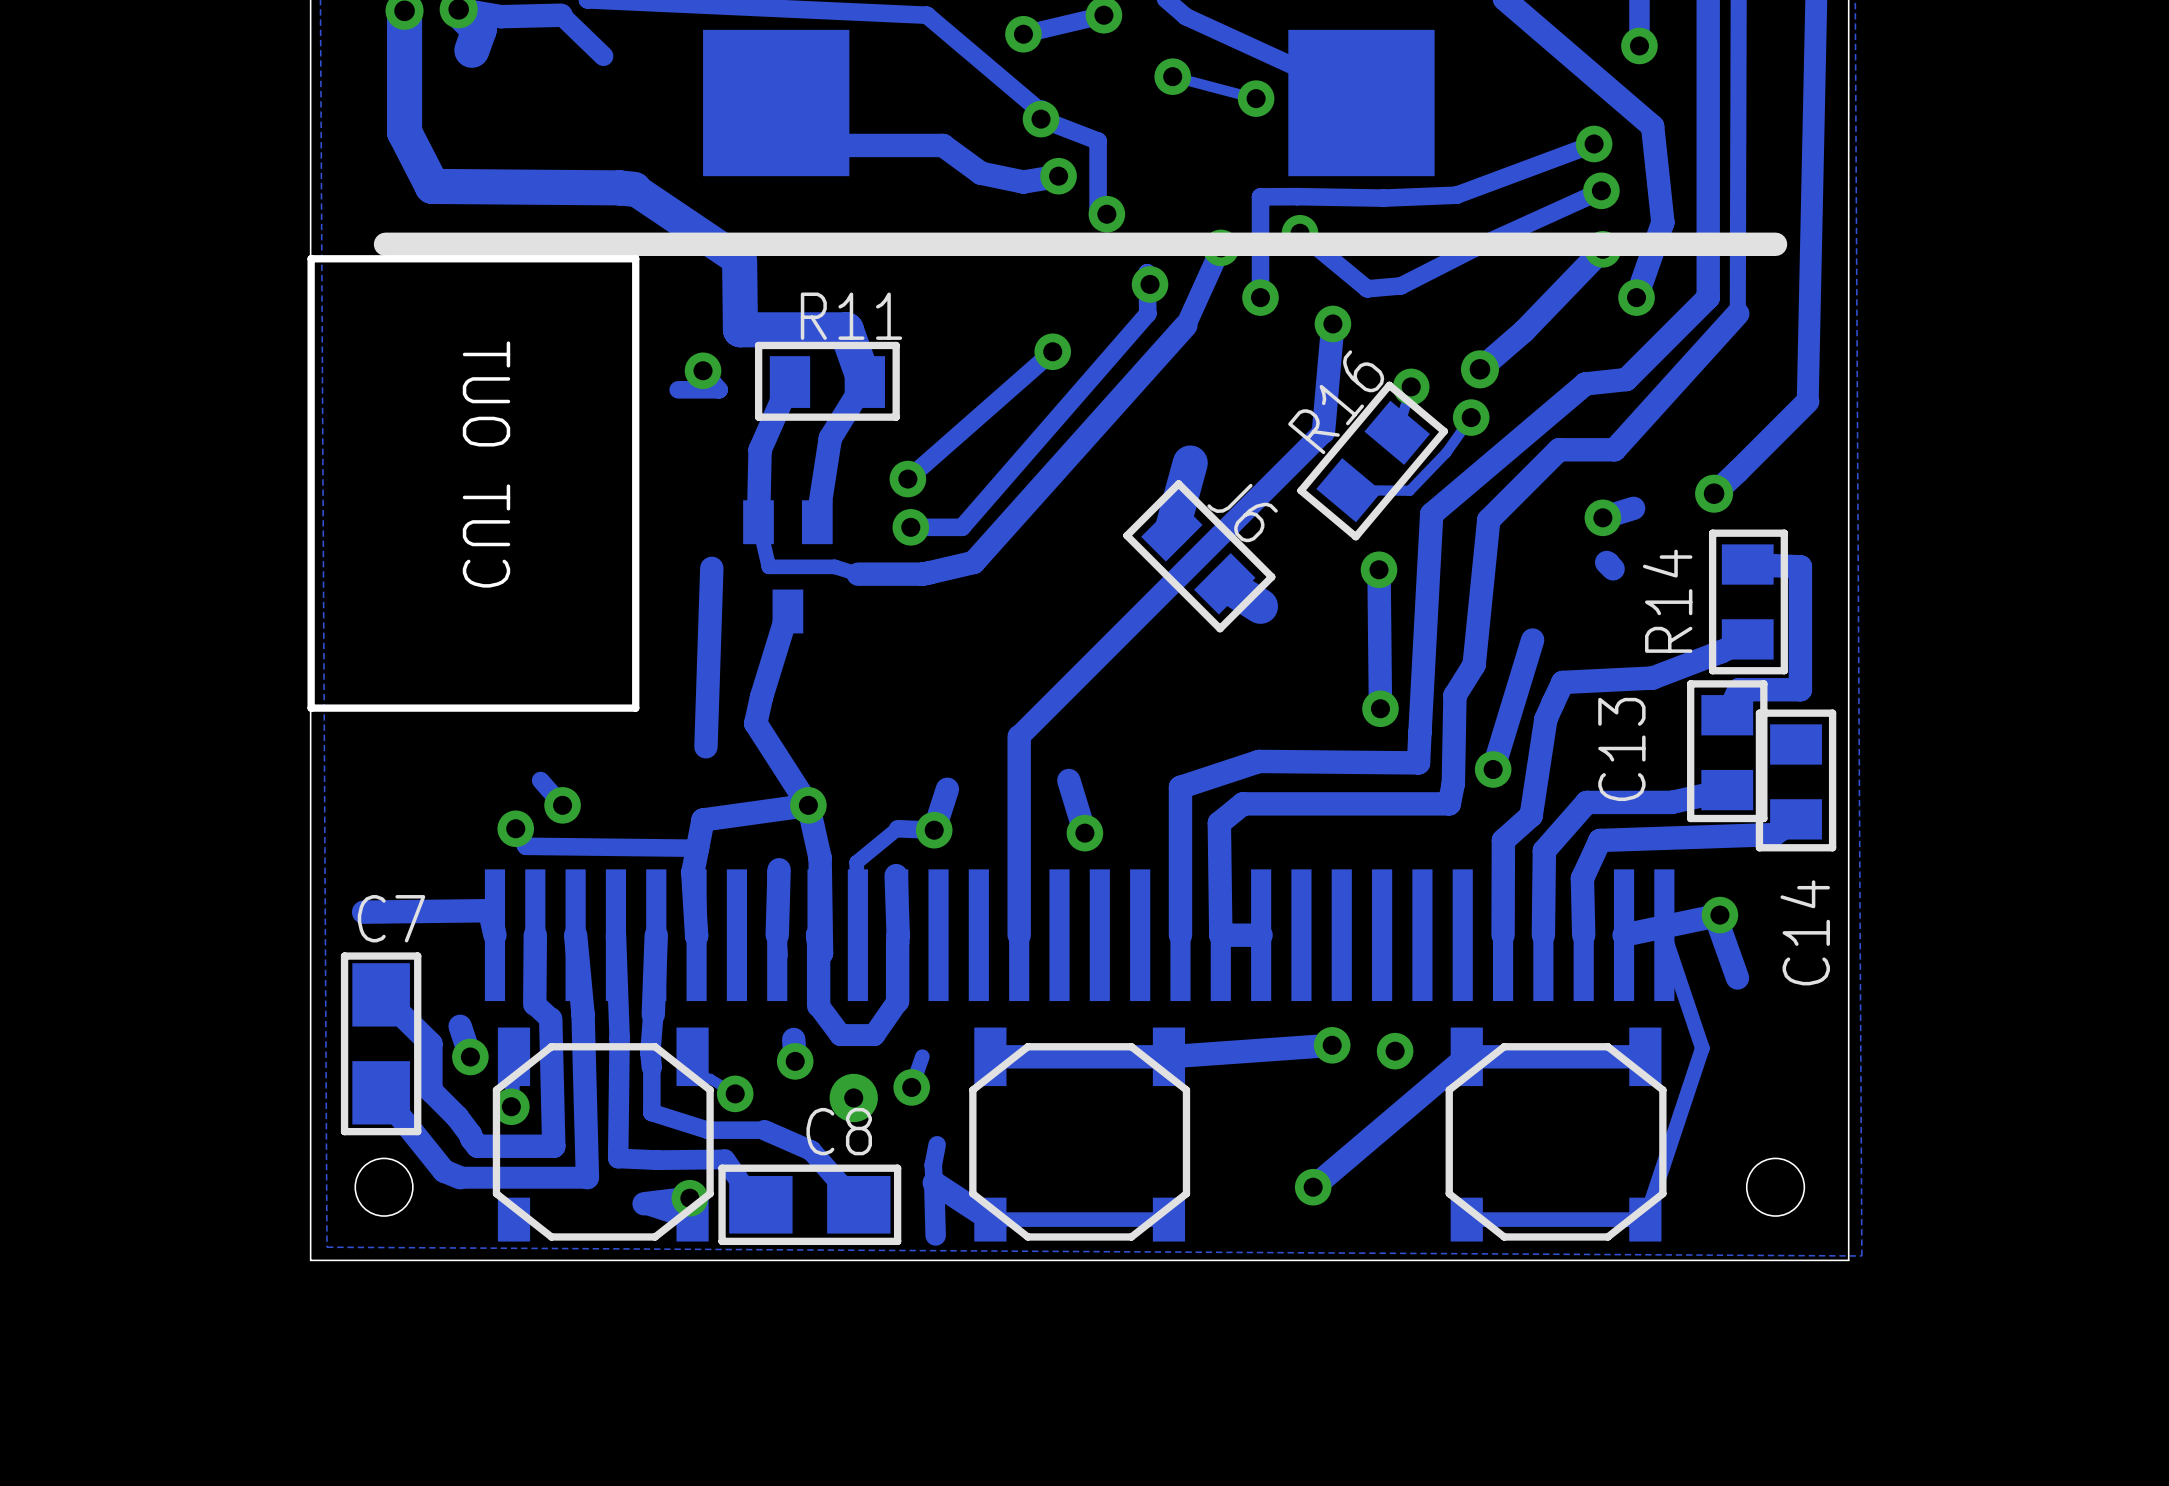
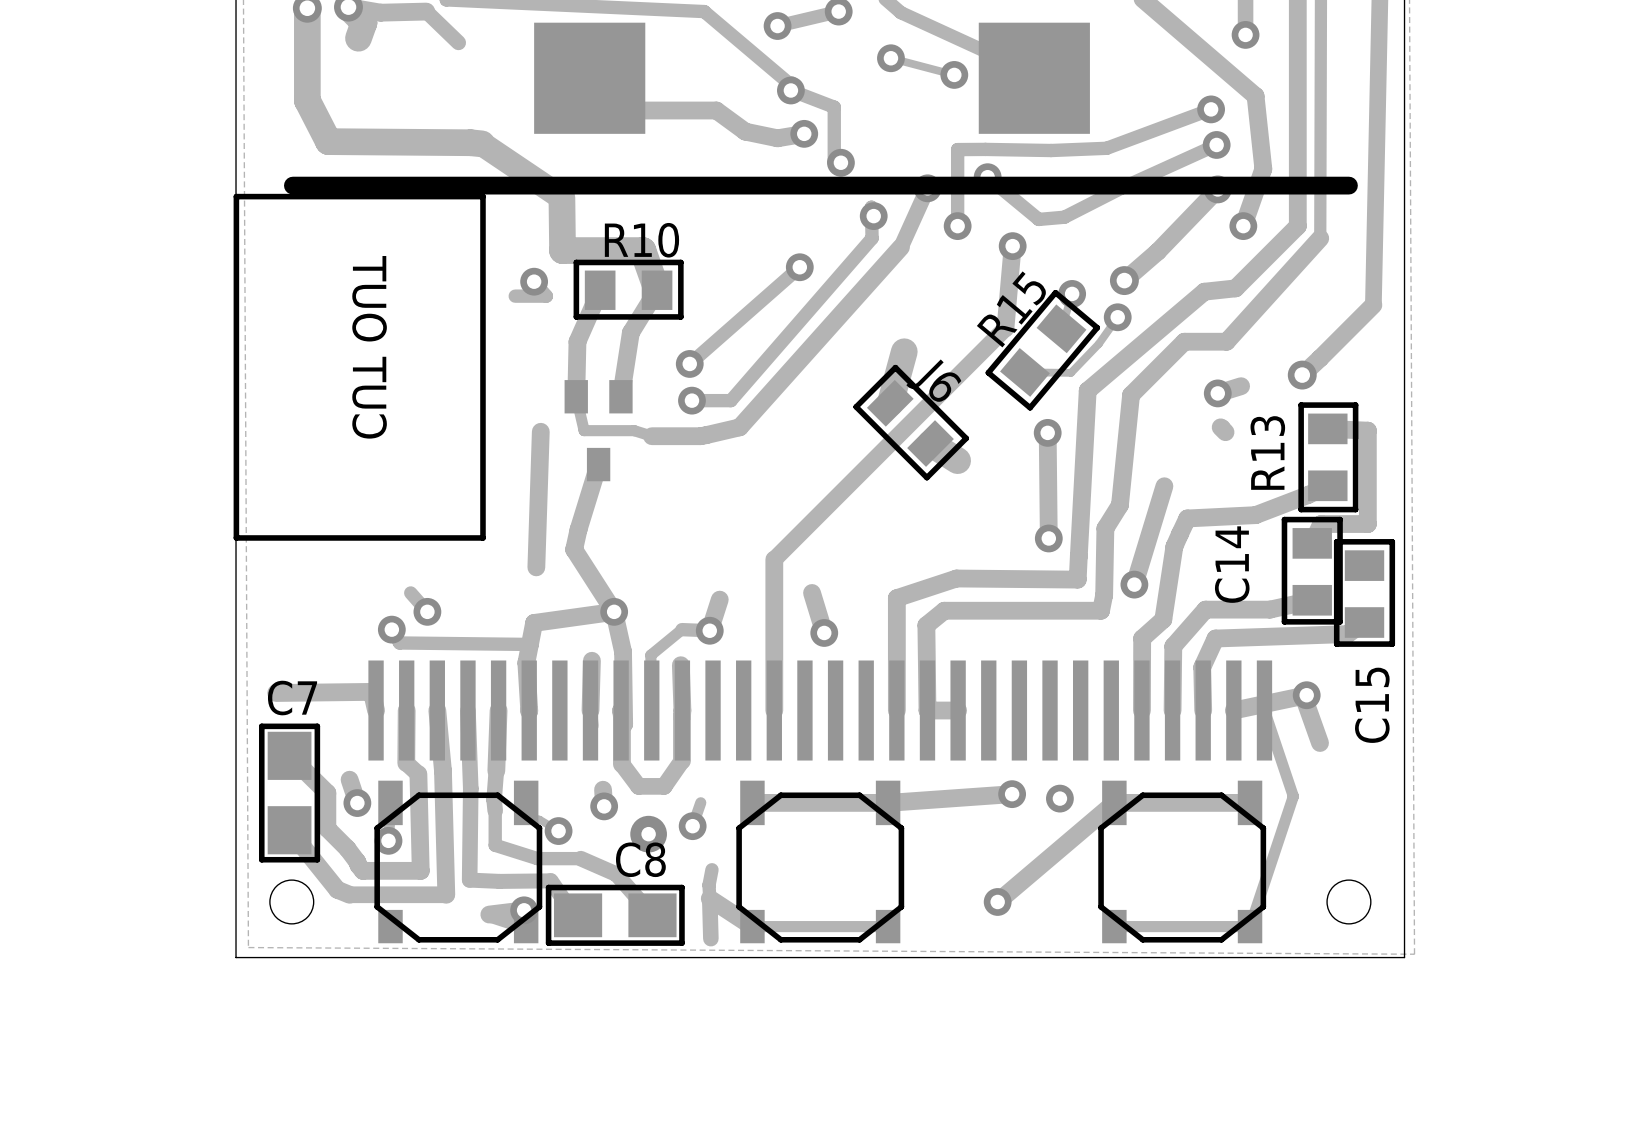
R11 name: R11 (851, 316) -> R10 (641, 240)
R16 name: R16 (1336, 402) -> R15 (1011, 309)
R14 name: R14 (1667, 601) -> R13 (1267, 452)
C13 name: C13 (1621, 749) -> C14 (1232, 564)
C14 name: C14 (1805, 932) -> C15 (1372, 705)

